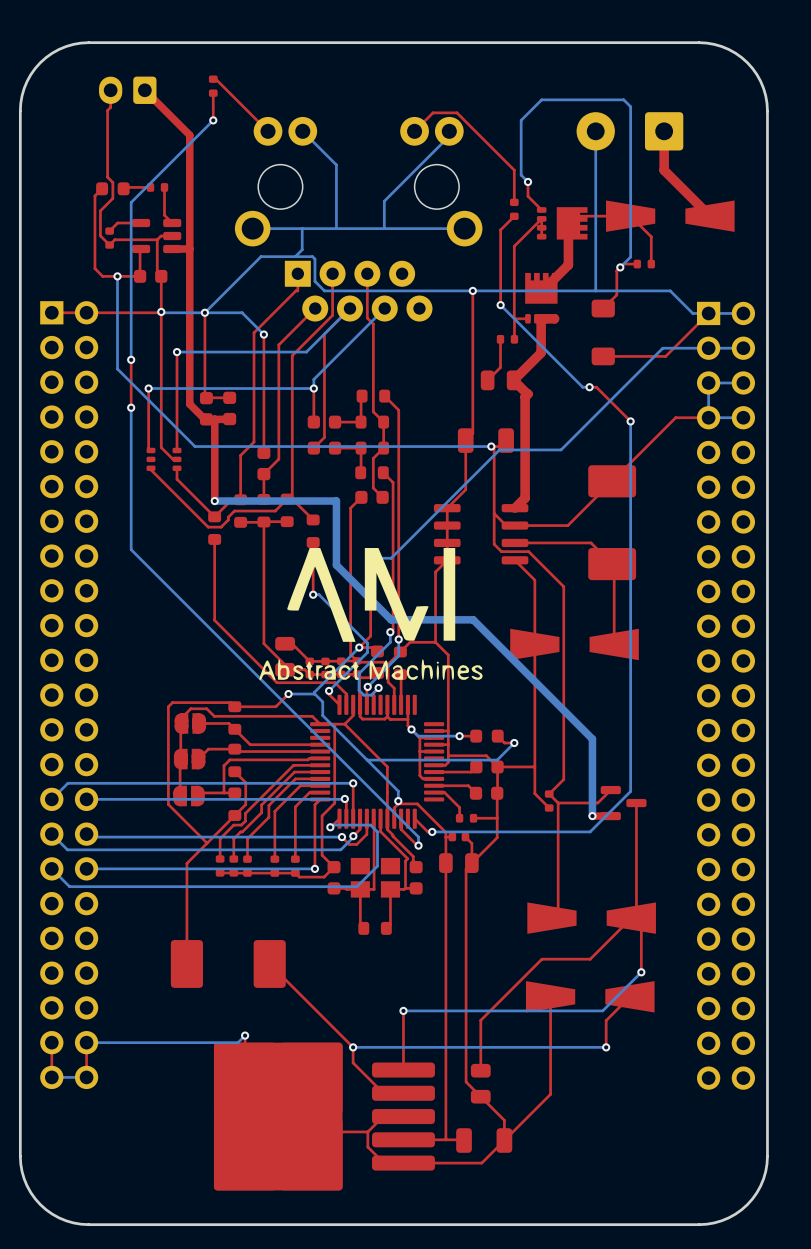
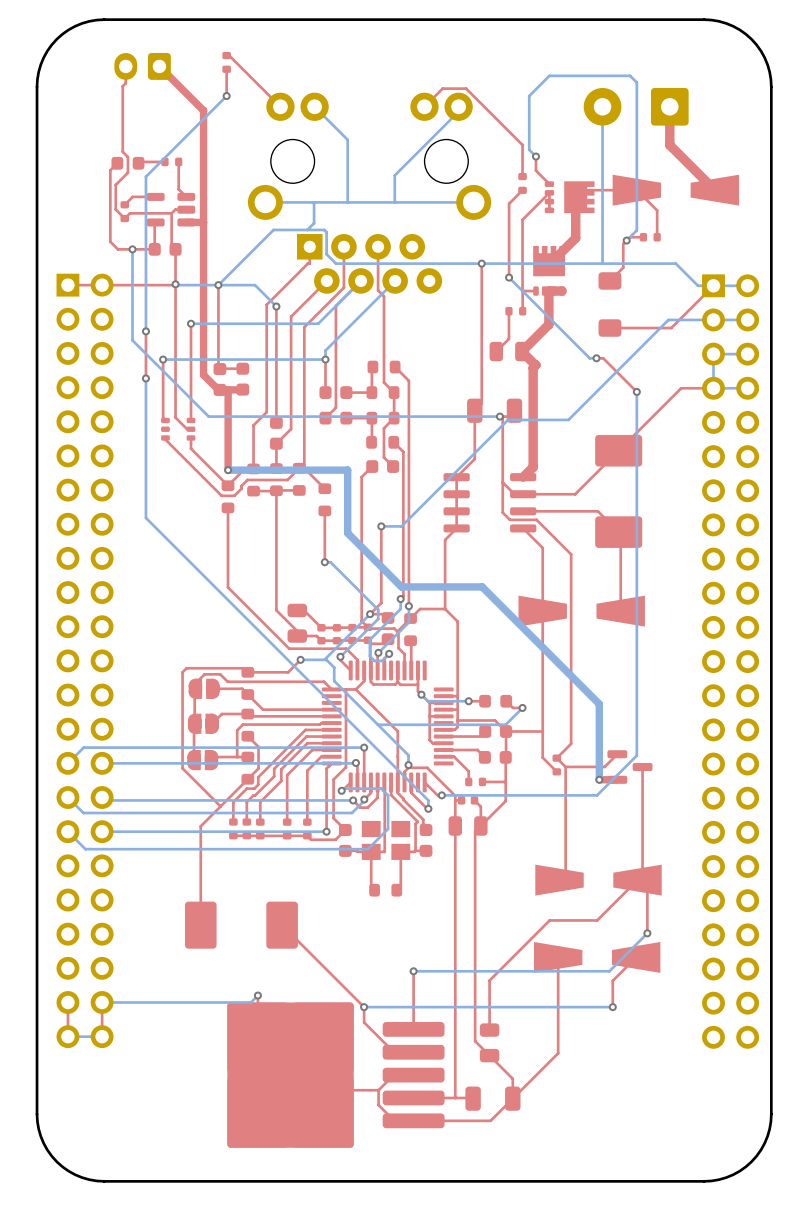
drawing: [259, 548, 483, 681] -> none

